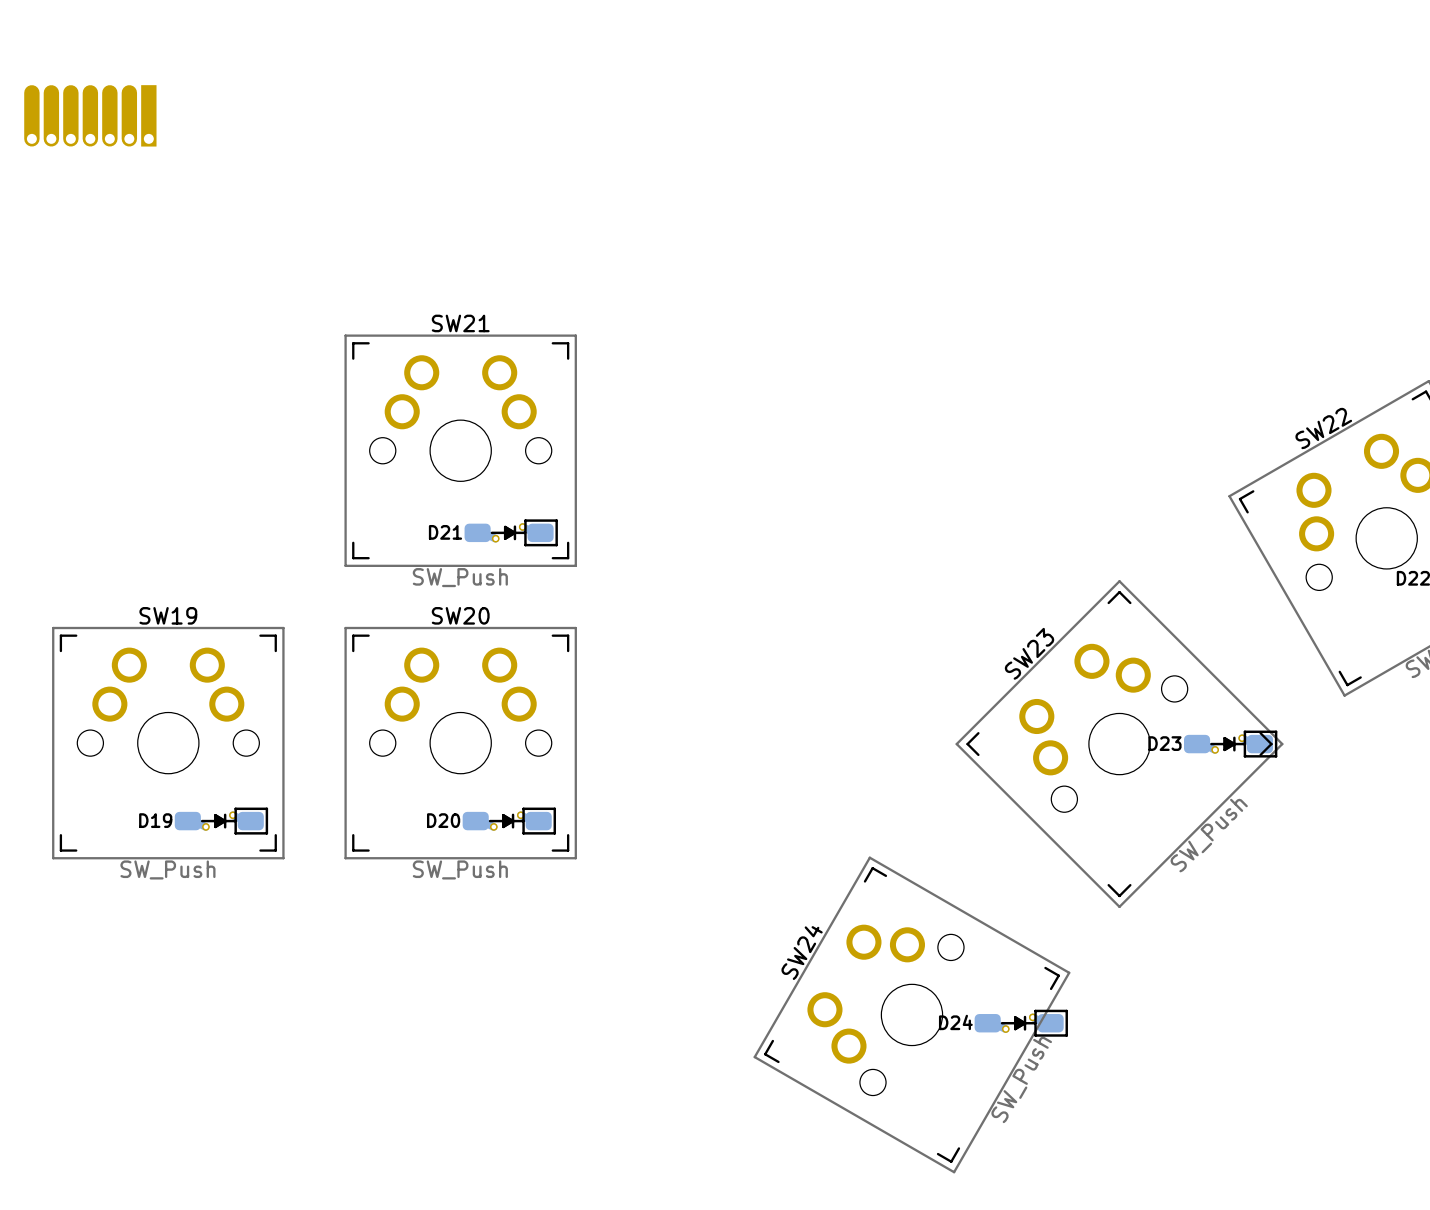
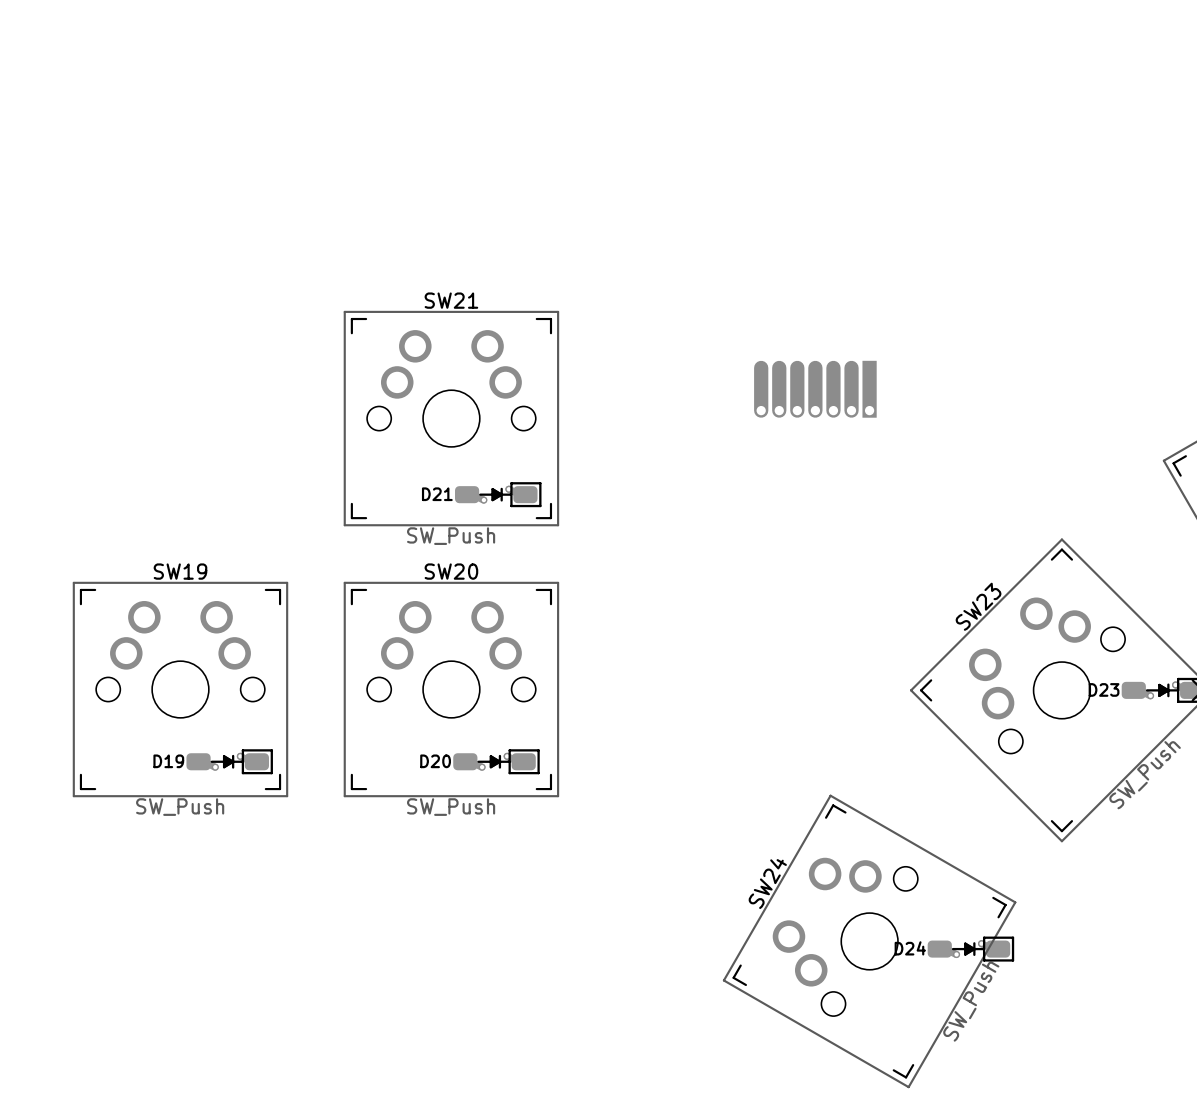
part: (90, 115) -> none
part: none -> (815, 389)

